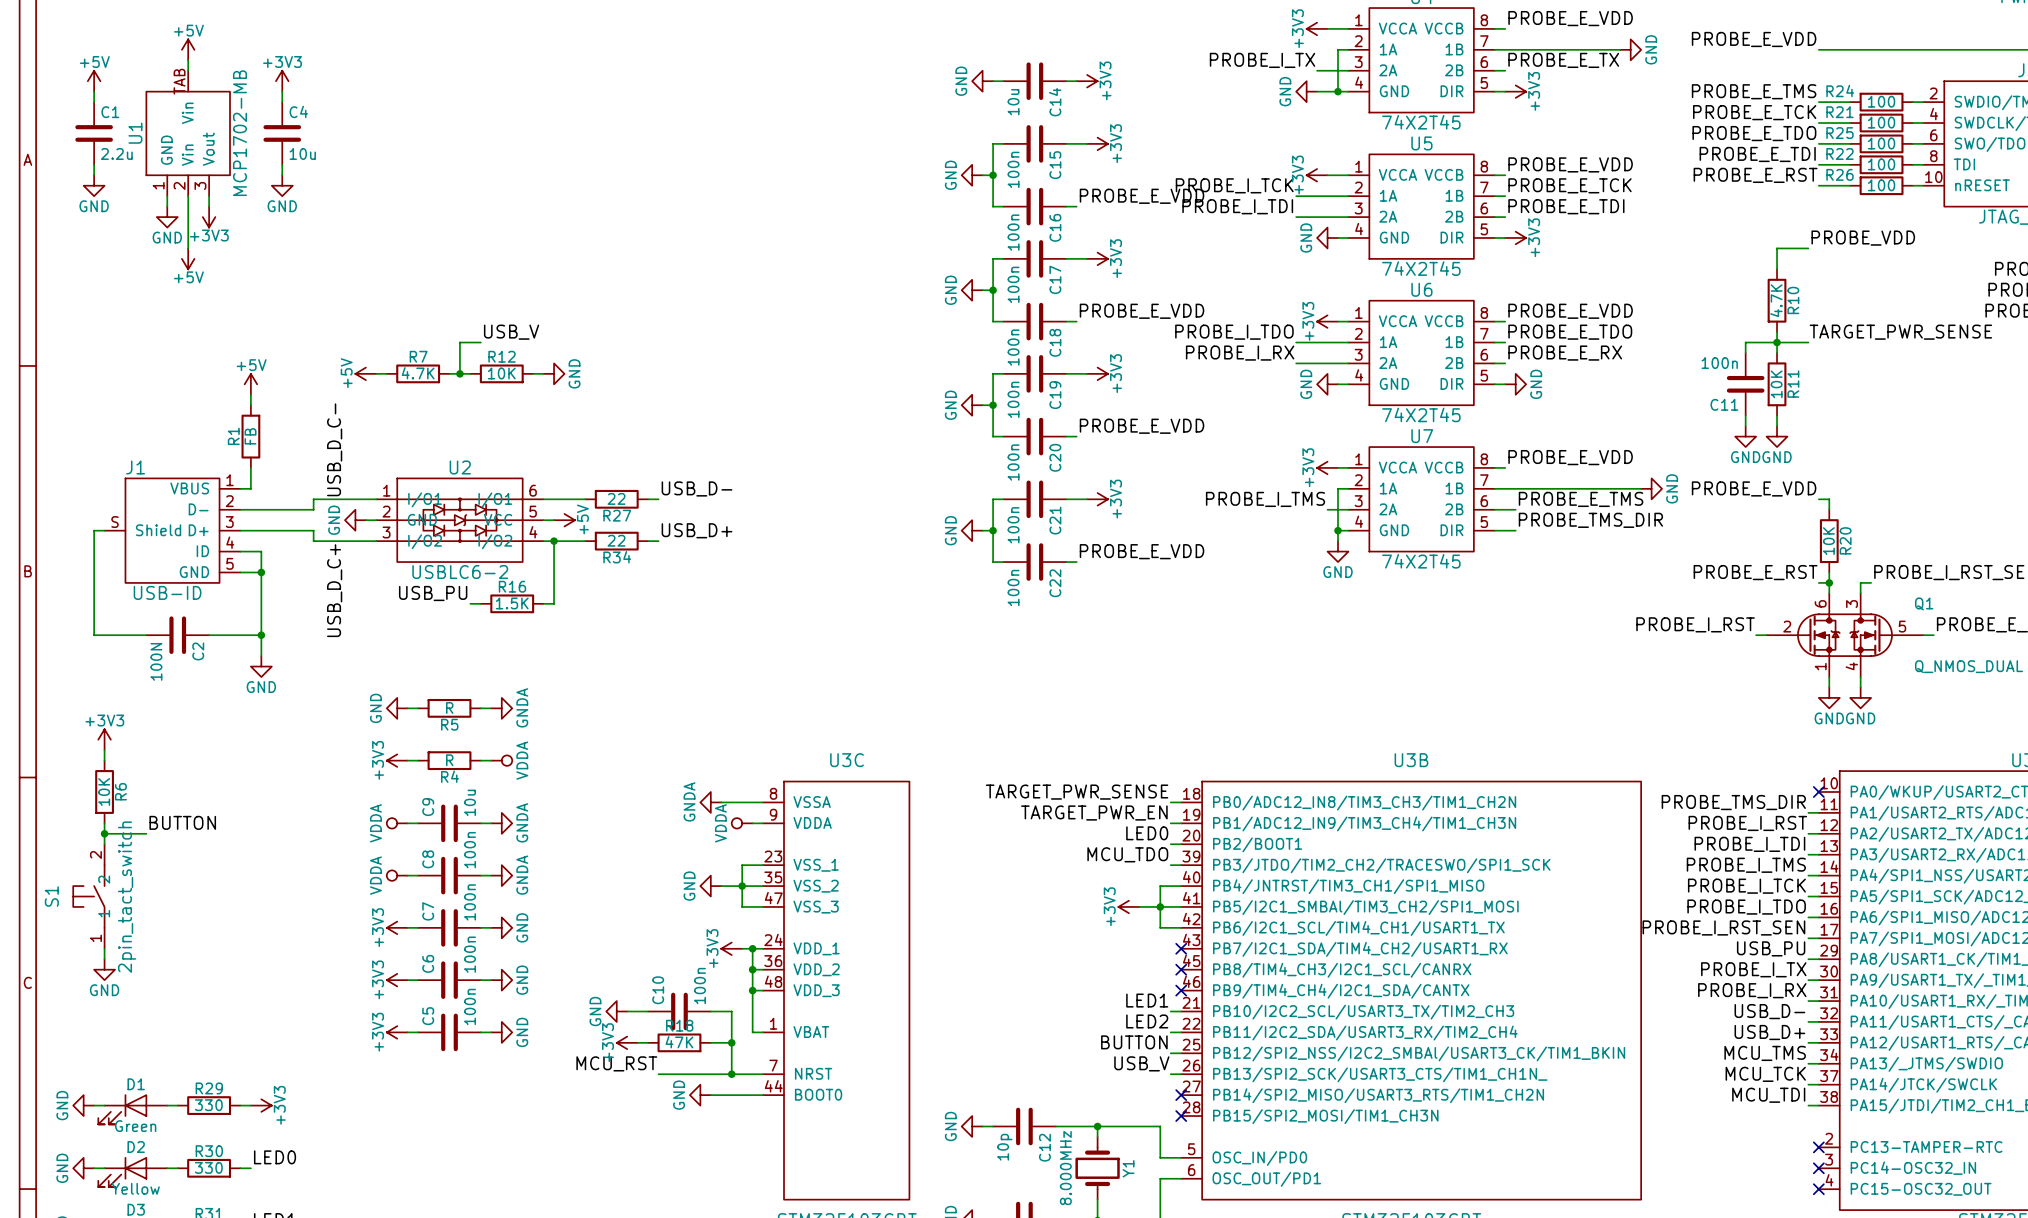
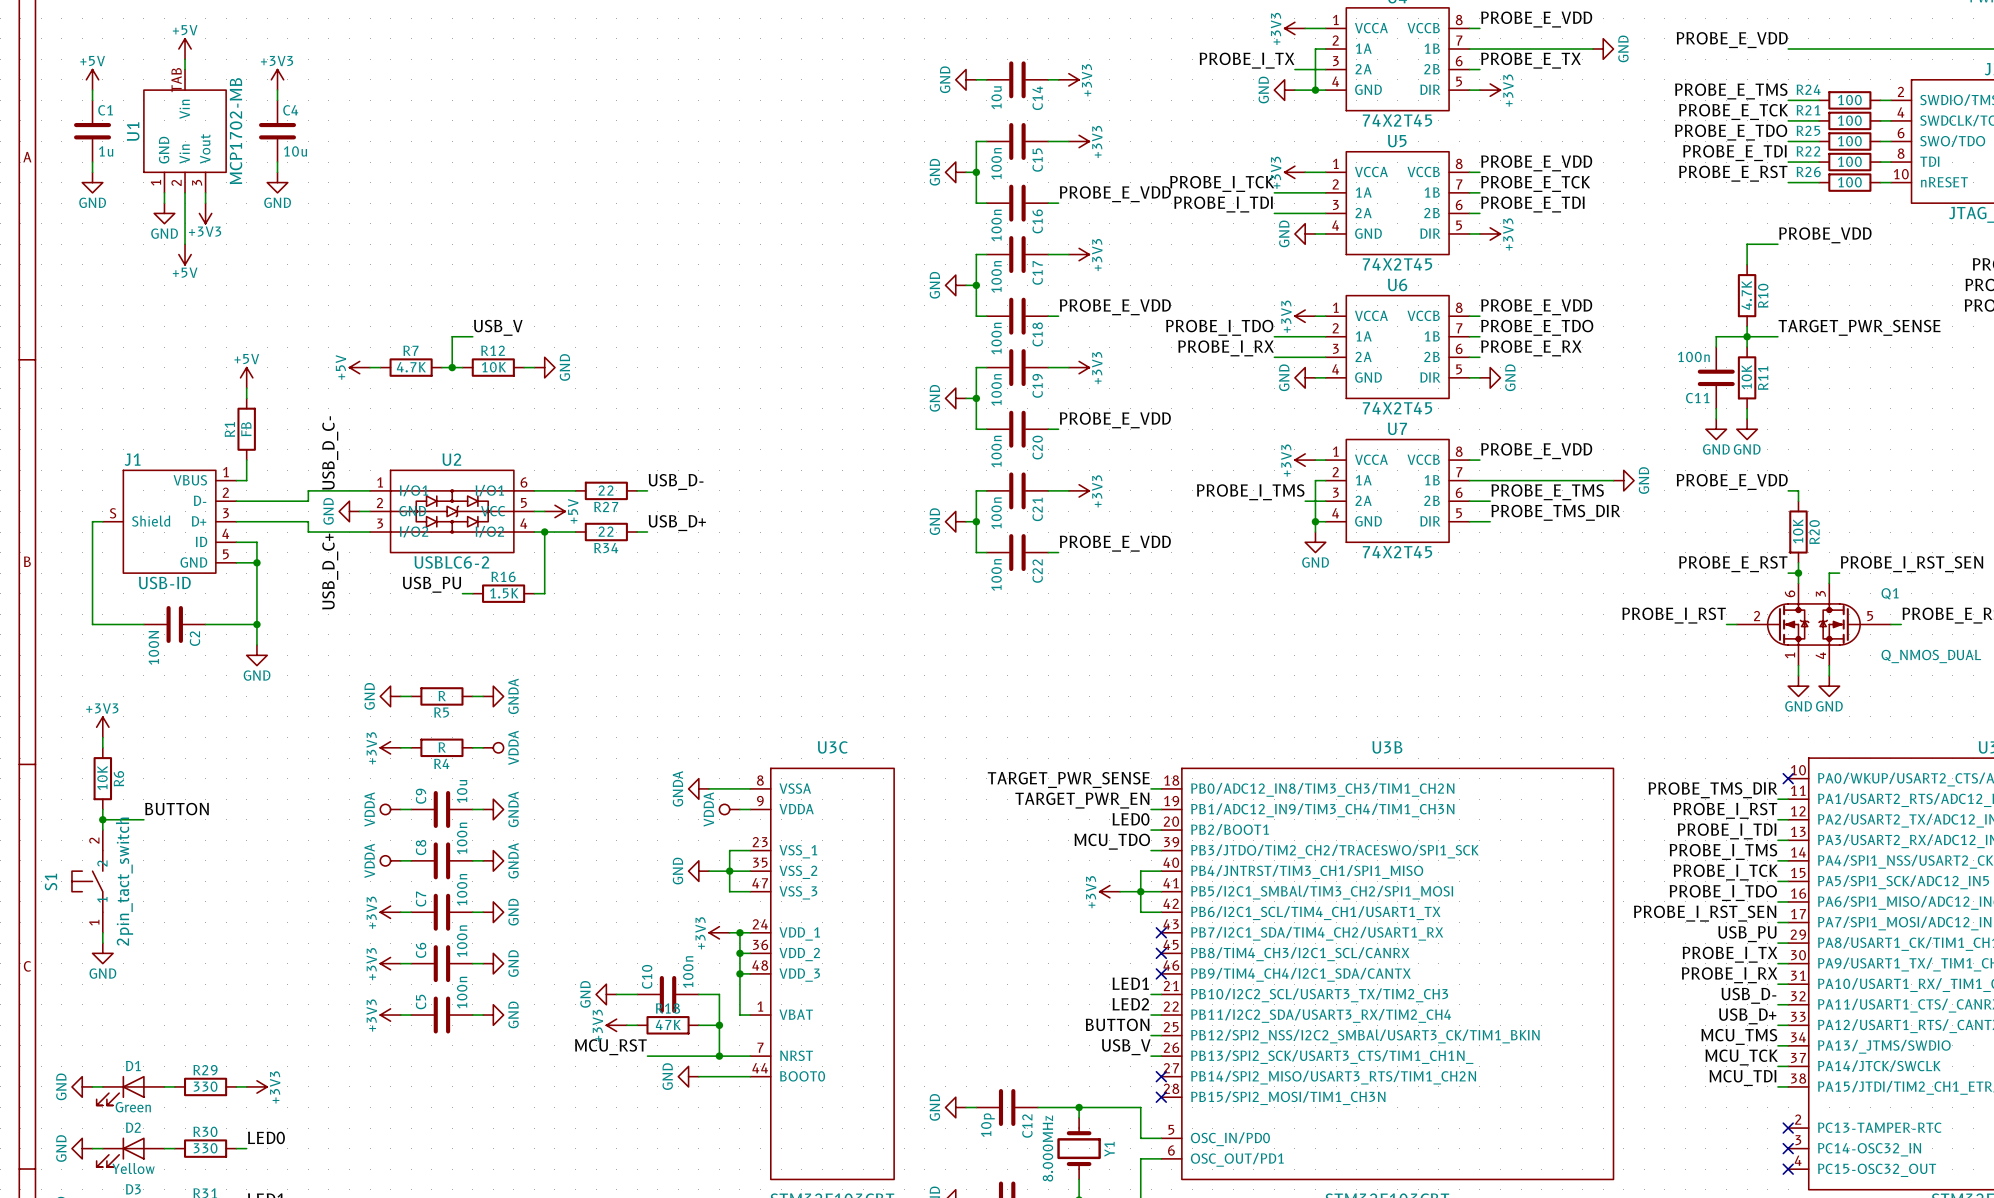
C1 value: 2.2u (116, 153) -> 1u (106, 151)

